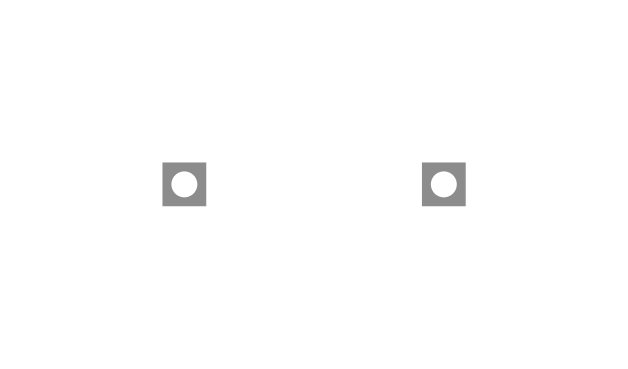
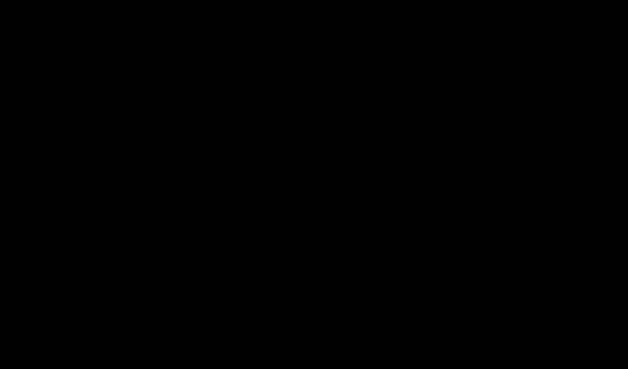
part: (184, 184) -> none
part: (443, 184) -> none

